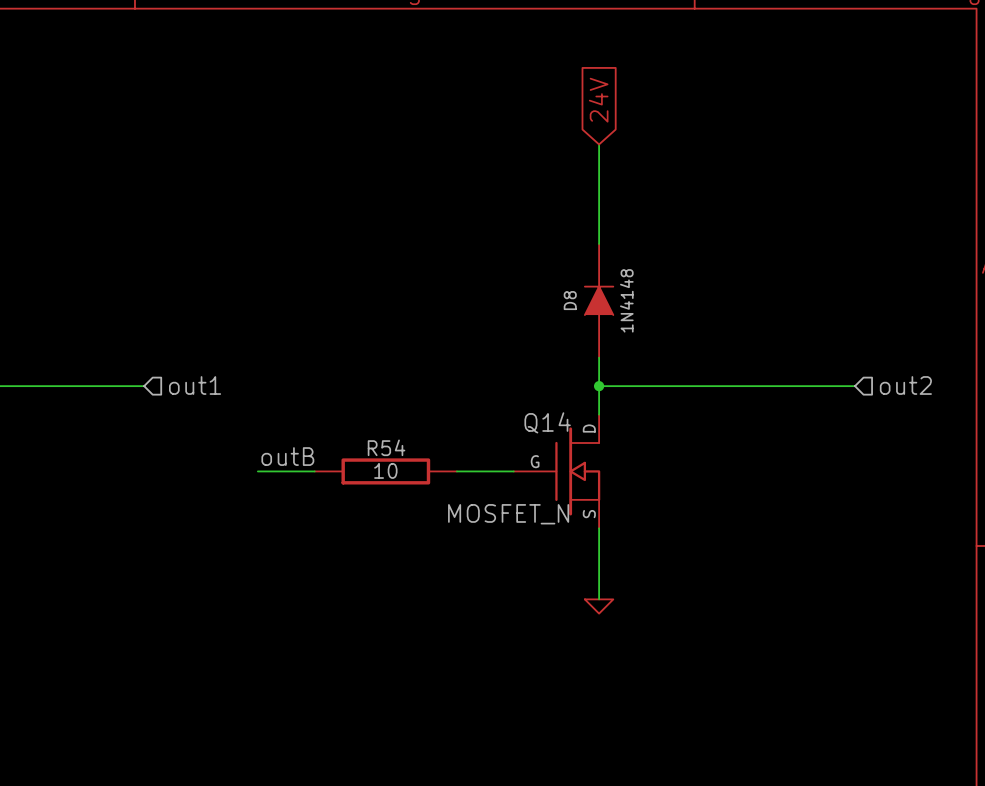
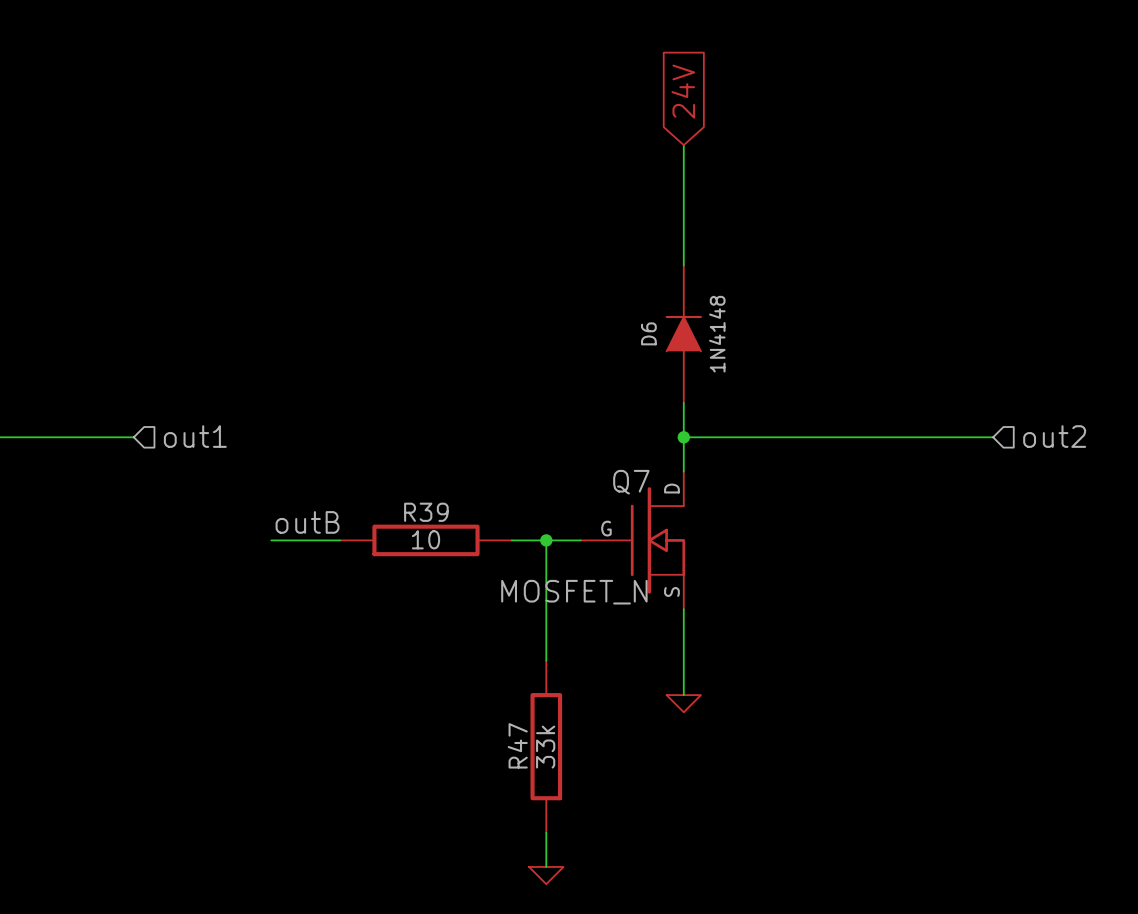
D8 name: D8 (570, 300) -> D6 (648, 333)
Q14 name: Q14 (547, 422) -> Q7 (631, 482)
R54 name: R54 (386, 447) -> R39 (426, 512)
wire: none -> (546, 540) (546, 660)
junction: none -> (546, 540)
R47: none -> 33k (546, 746)
wire: none -> (546, 832) (546, 866)
power symbol: none -> (546, 875)

